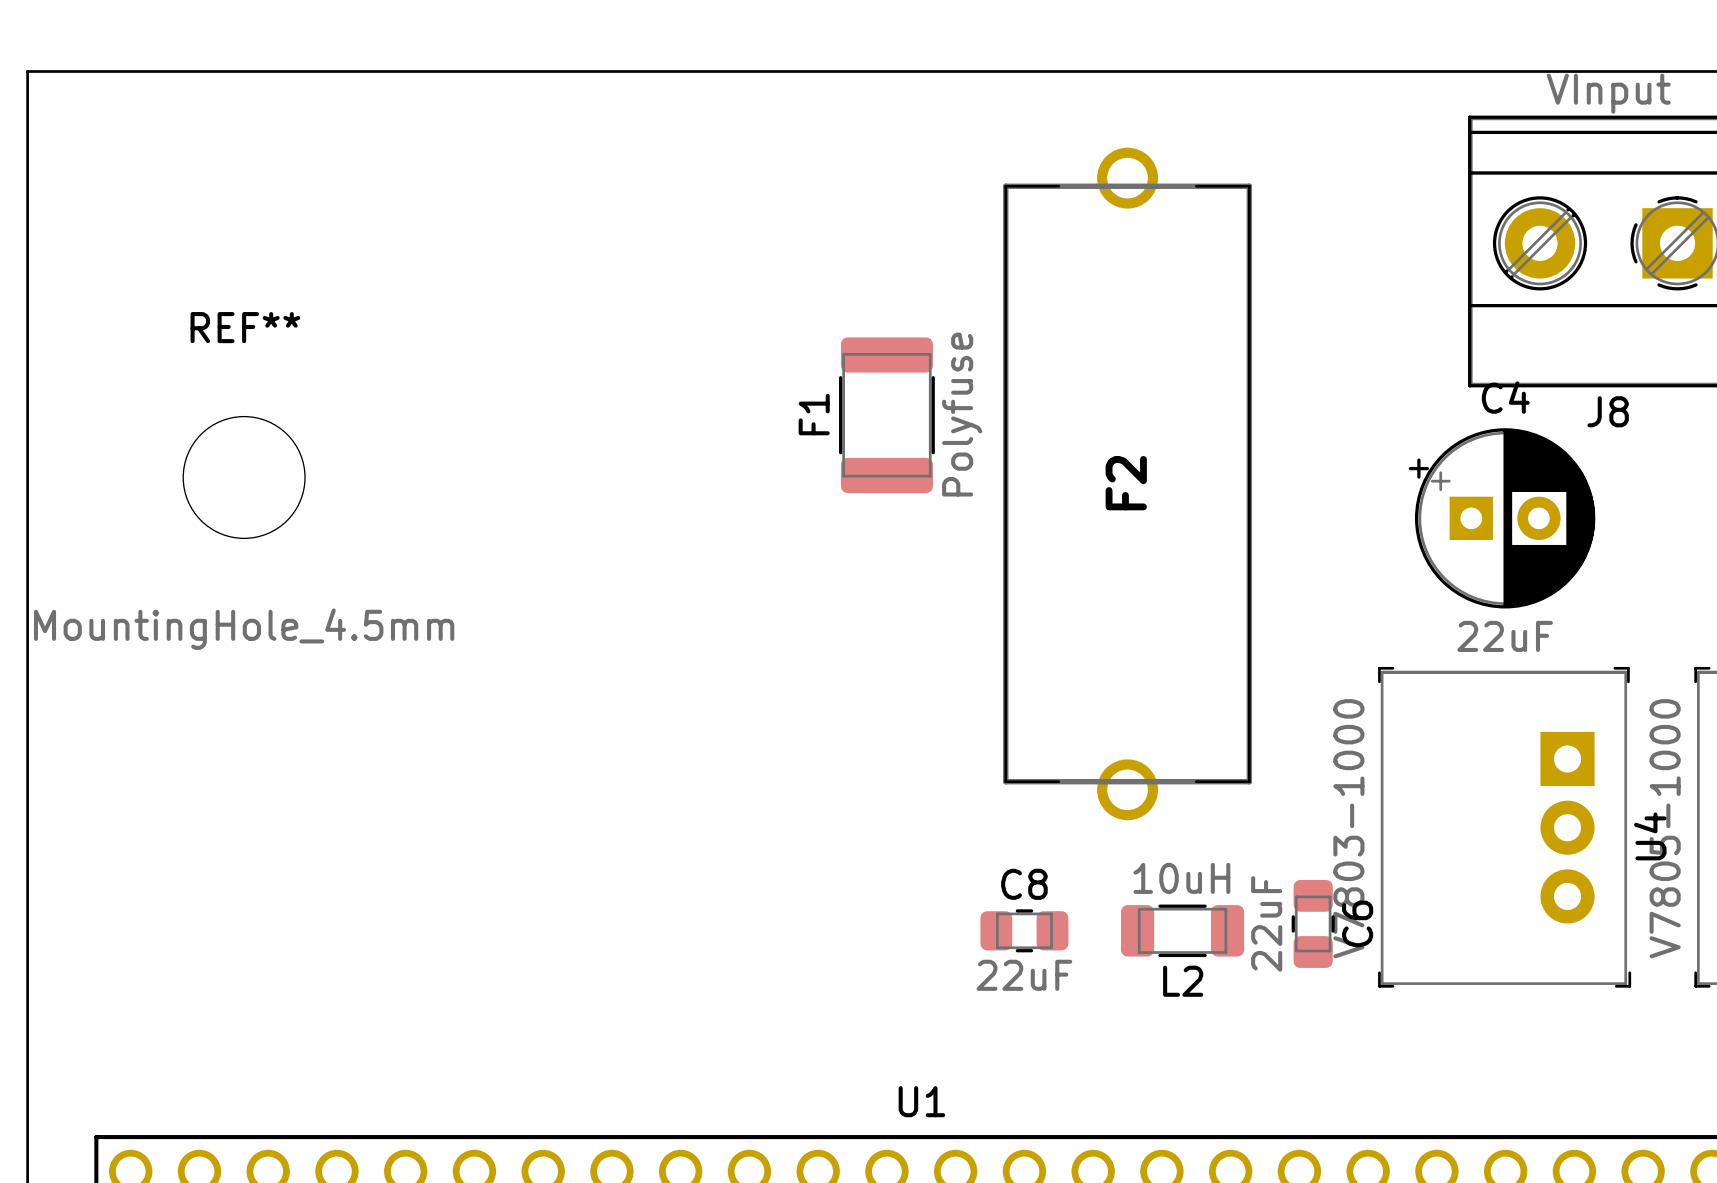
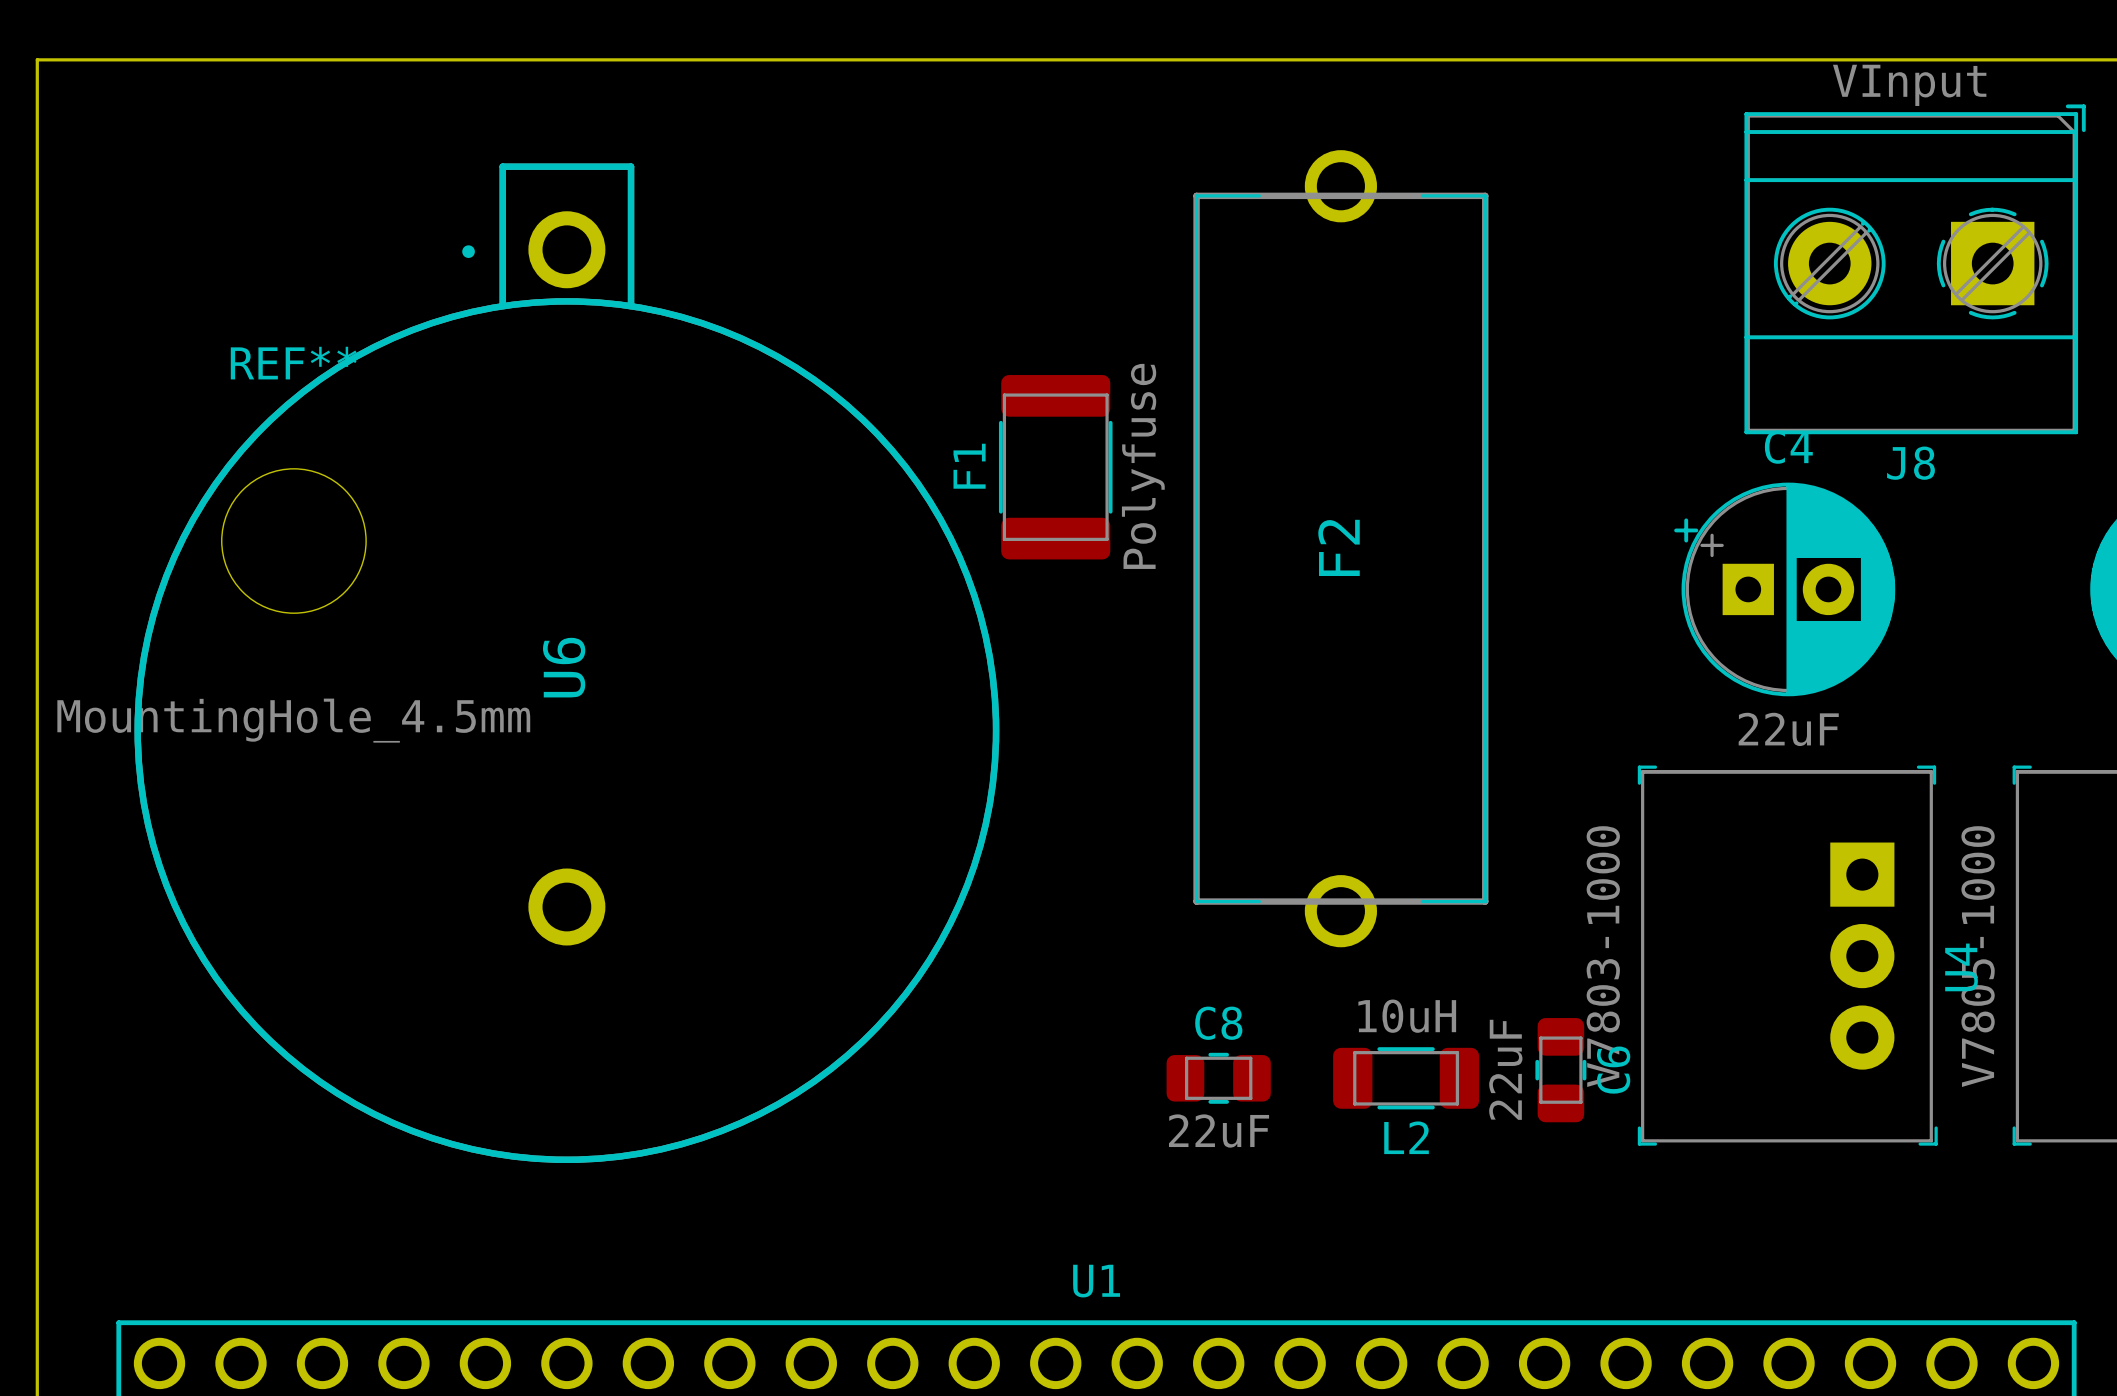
U6: none -> (566, 663)

